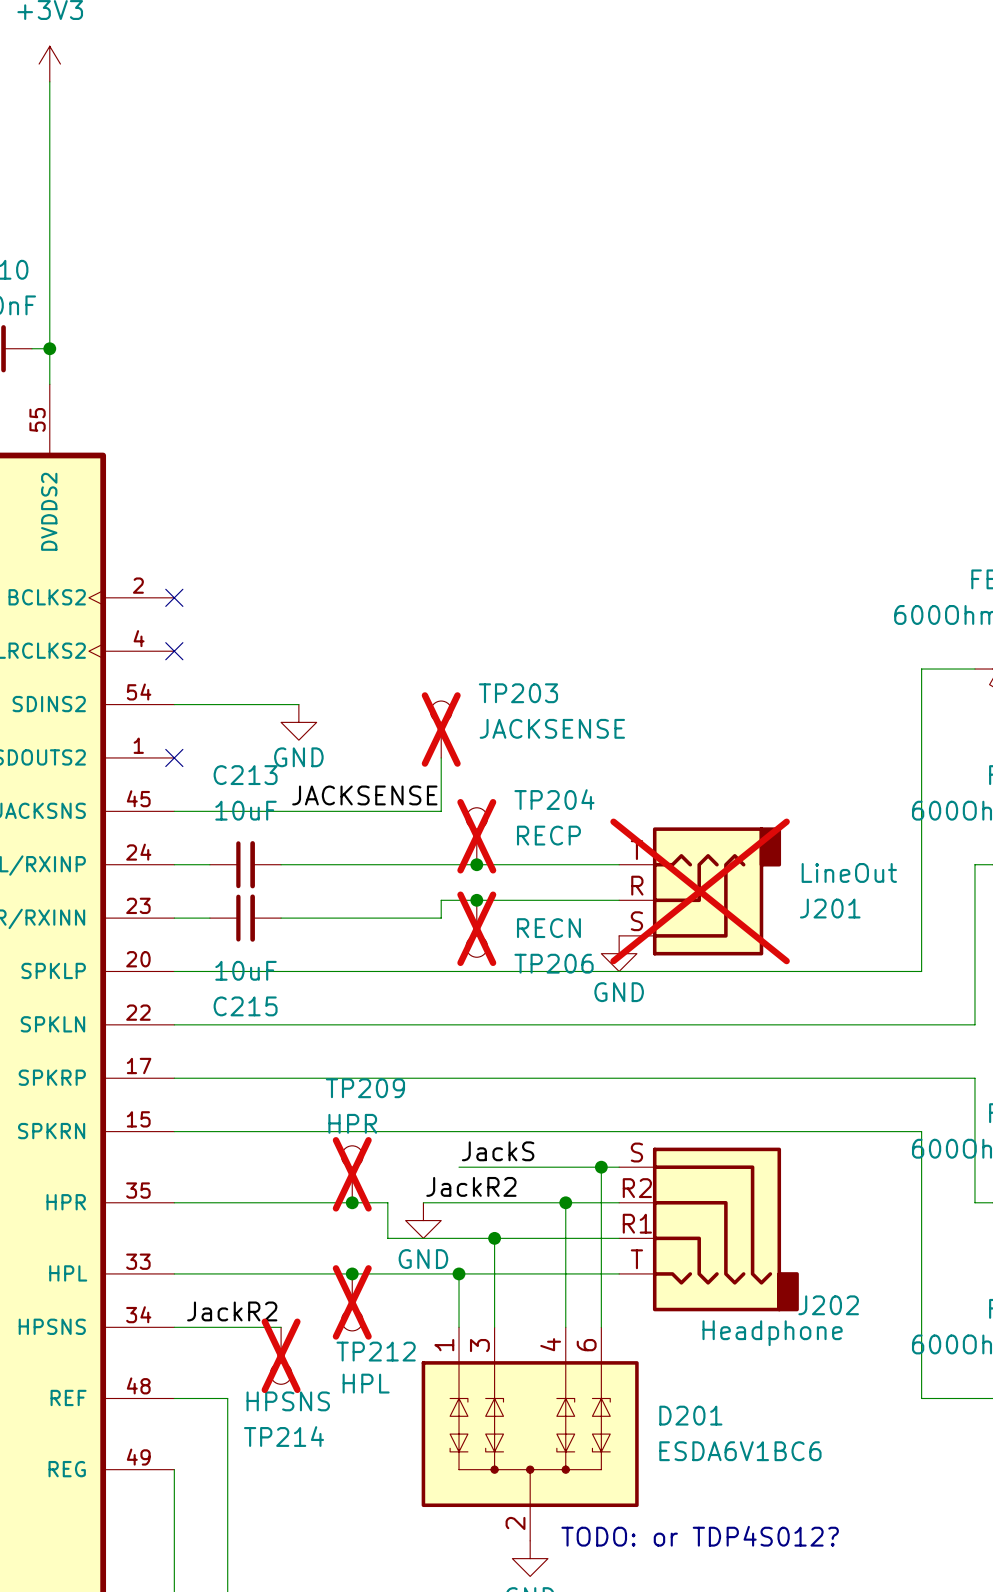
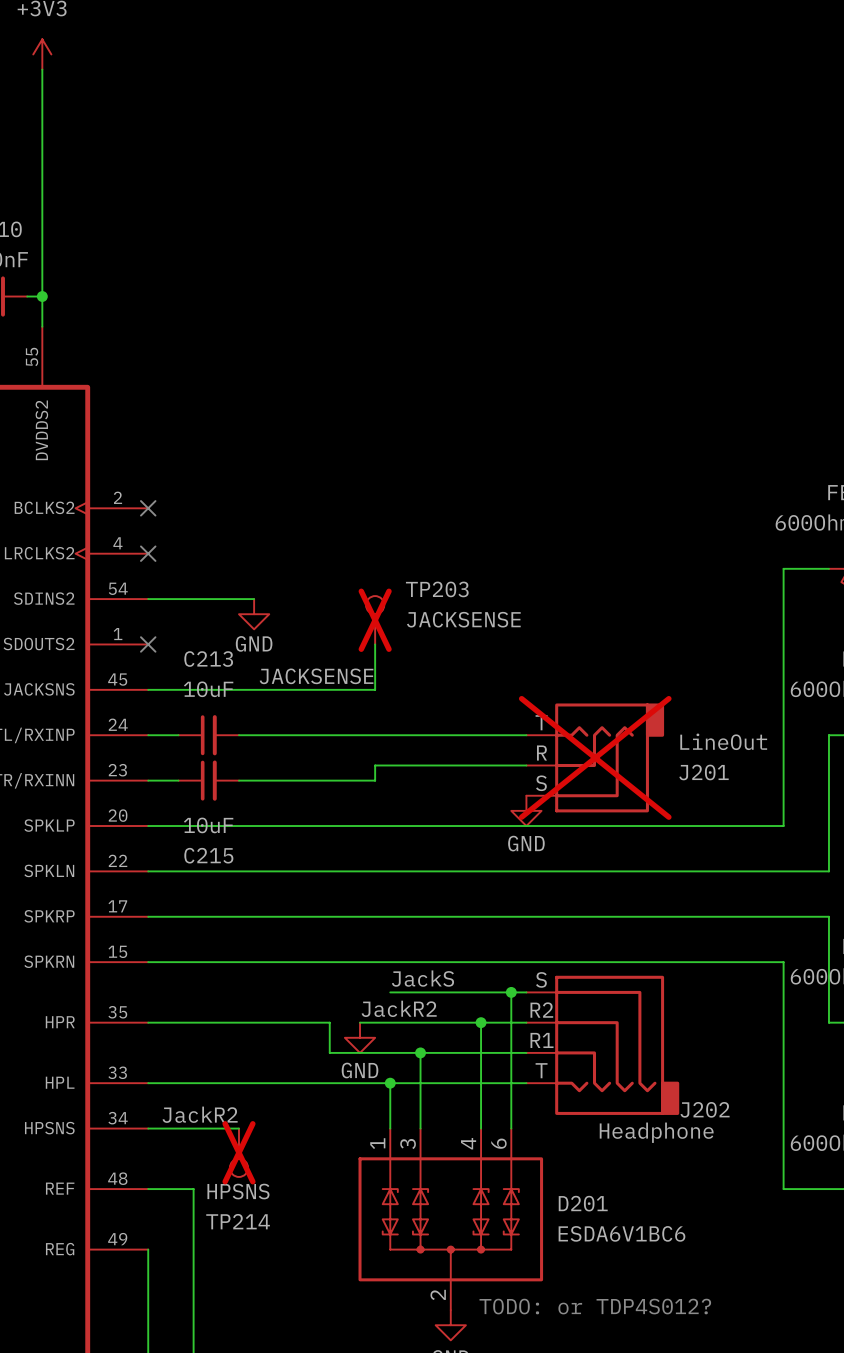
TP204: RECP (476, 836) -> none
junction: (476, 864) -> none
junction: (476, 900) -> none
TP206: RECN (476, 928) -> none
TP209: HPR (352, 1174) -> none
junction: (352, 1202) -> none
junction: (352, 1273) -> none
TP212: HPL (352, 1302) -> none

